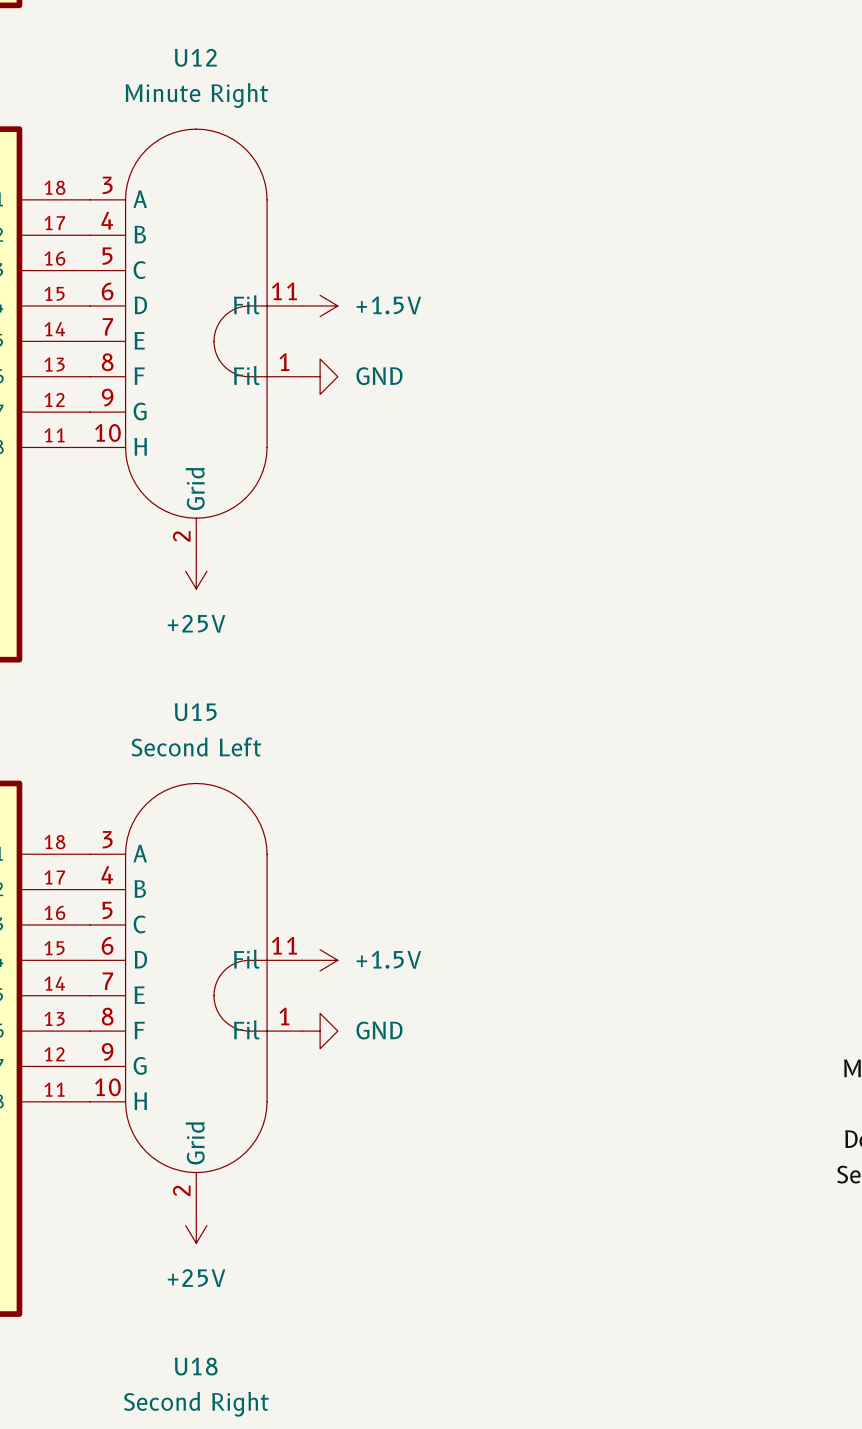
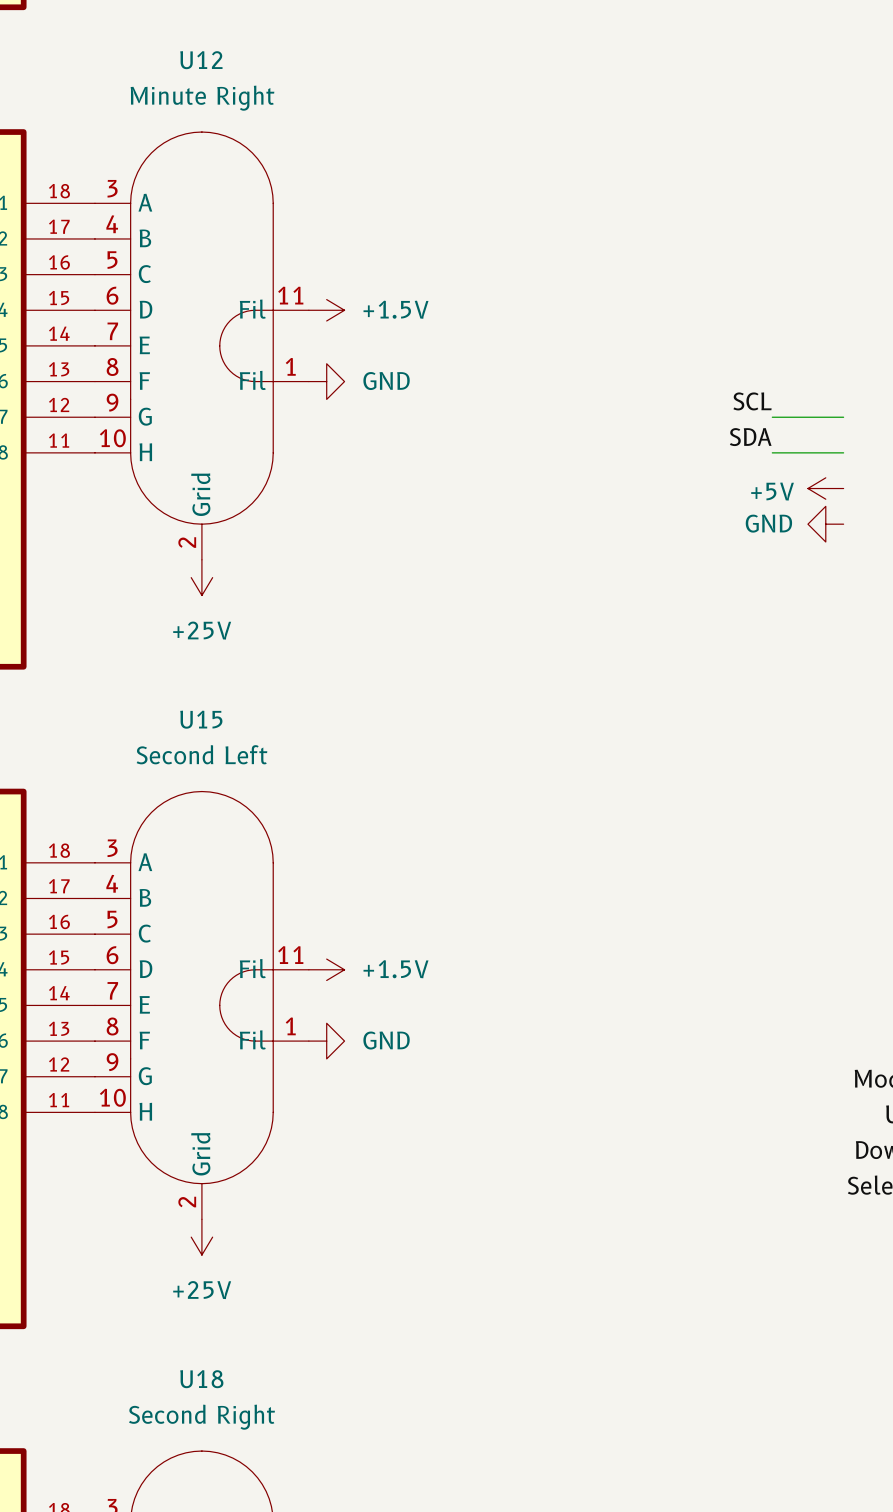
label: none -> SCL (752, 401)
wire: none -> (772, 417) (843, 417)
label: none -> SDA (750, 437)
wire: none -> (772, 452) (843, 452)
power symbol: none -> +5V (825, 488)
power symbol: none -> GND (825, 524)

